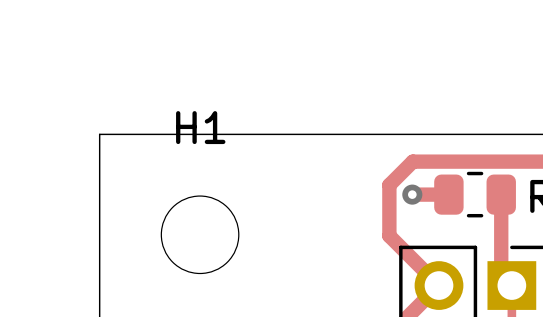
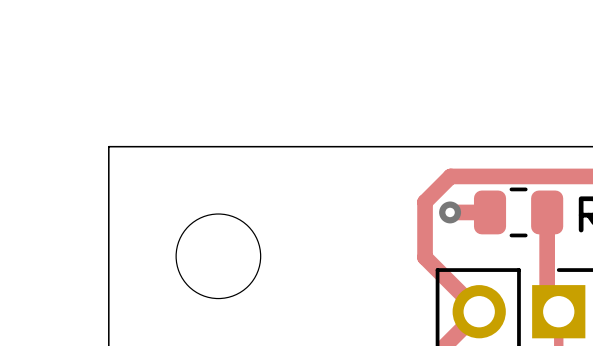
H1 name: H1 (200, 127) -> none

